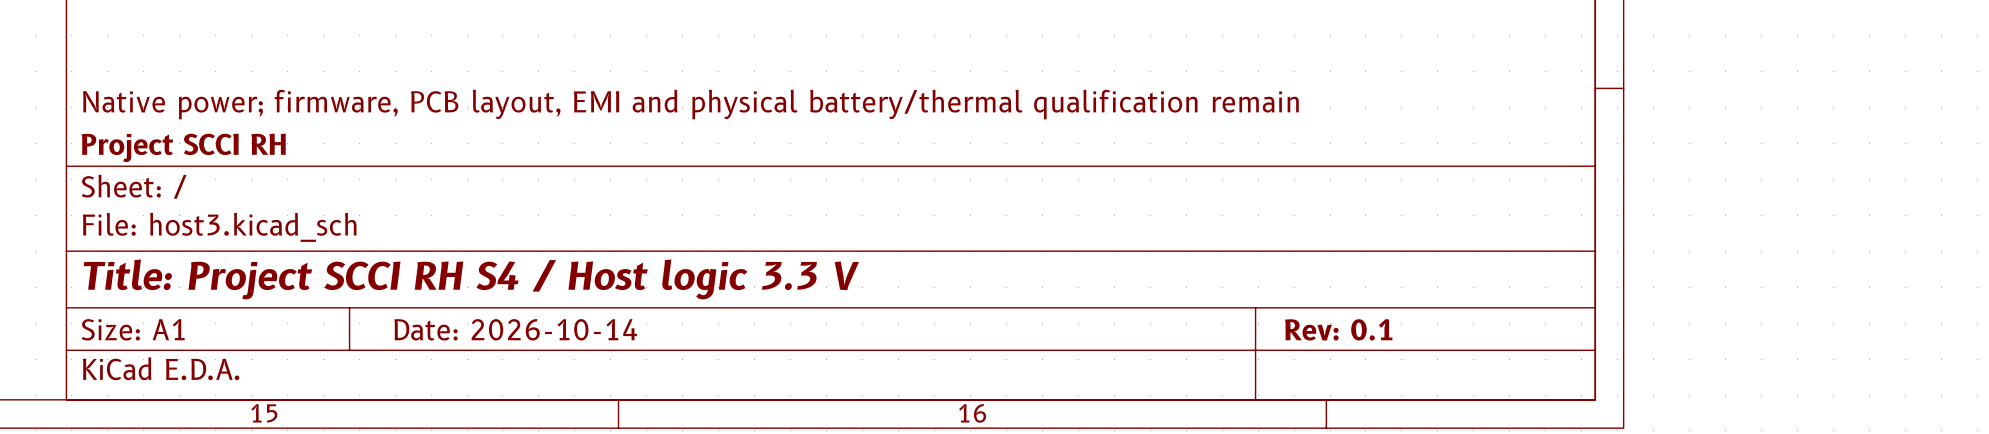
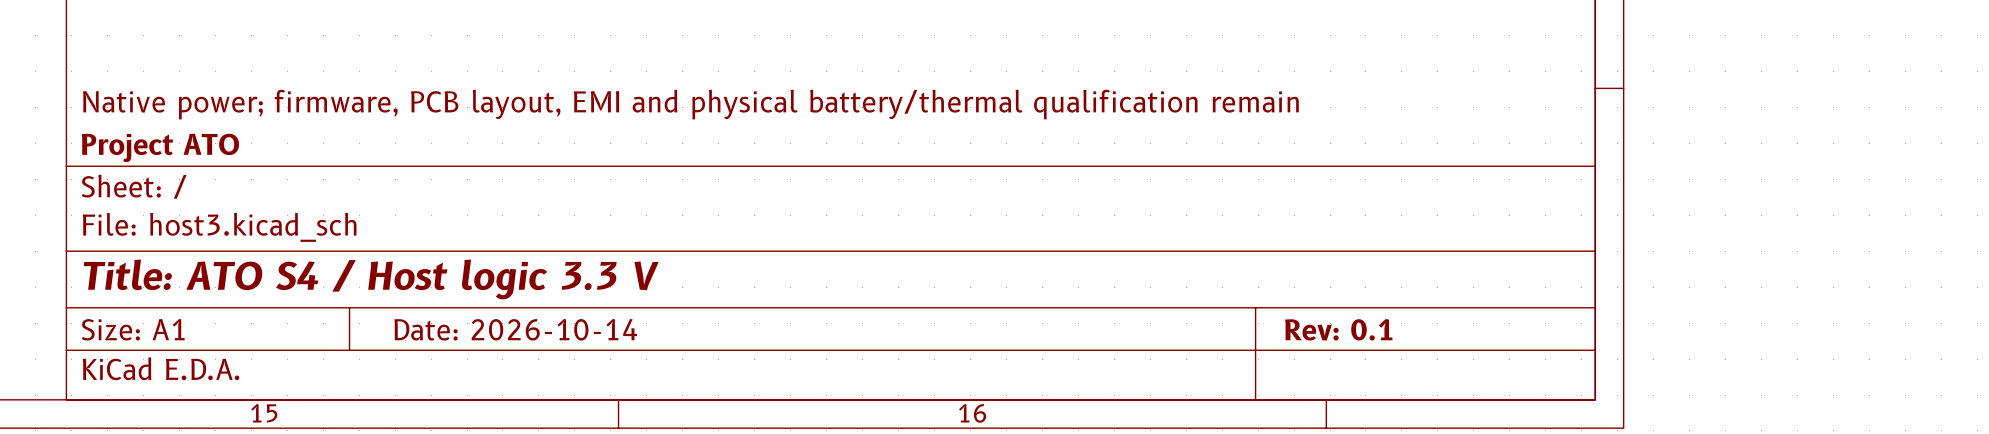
title block: Project SCCI RH (183, 147) -> Project ATO (160, 147)
title block: Title: Project SCCI RH S4 / Host logic 3.3 V (471, 279) -> Title: ATO S4 / Host logic 3.3 V (371, 279)

